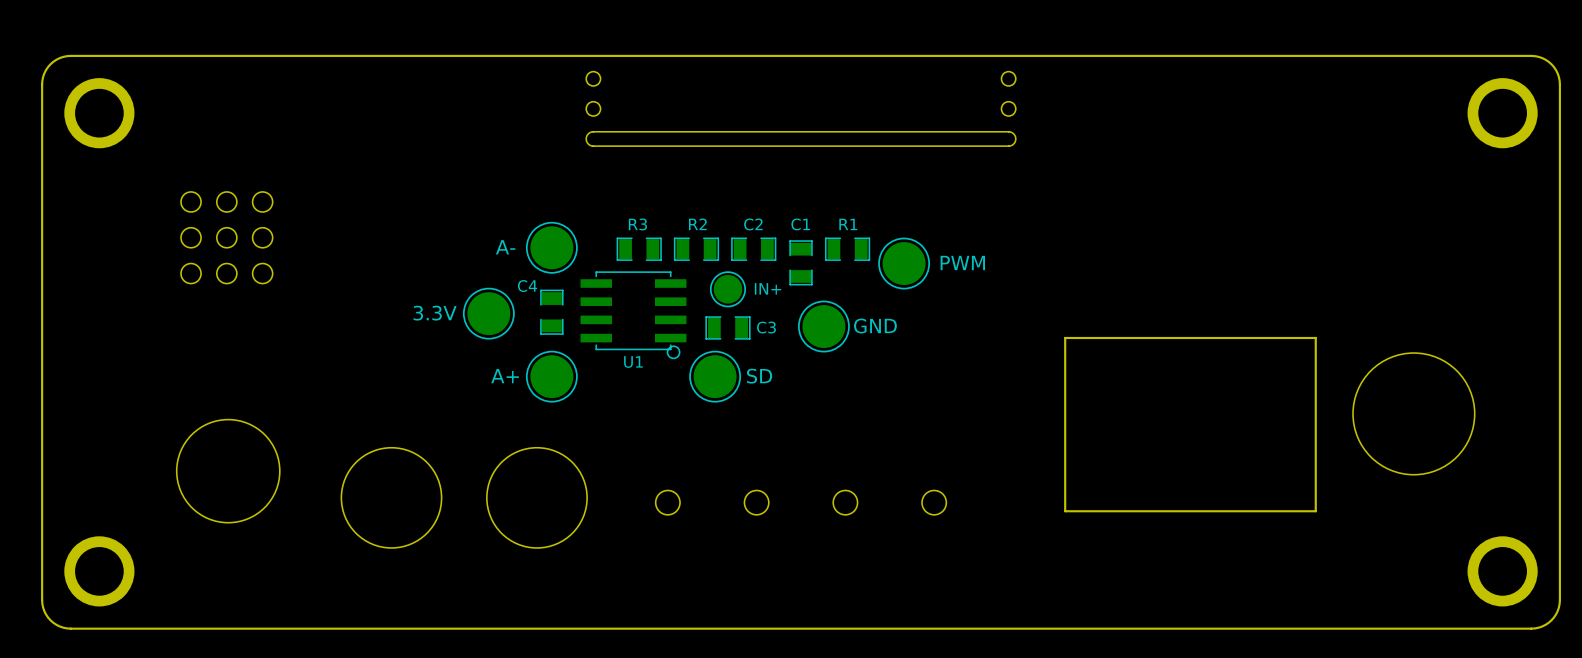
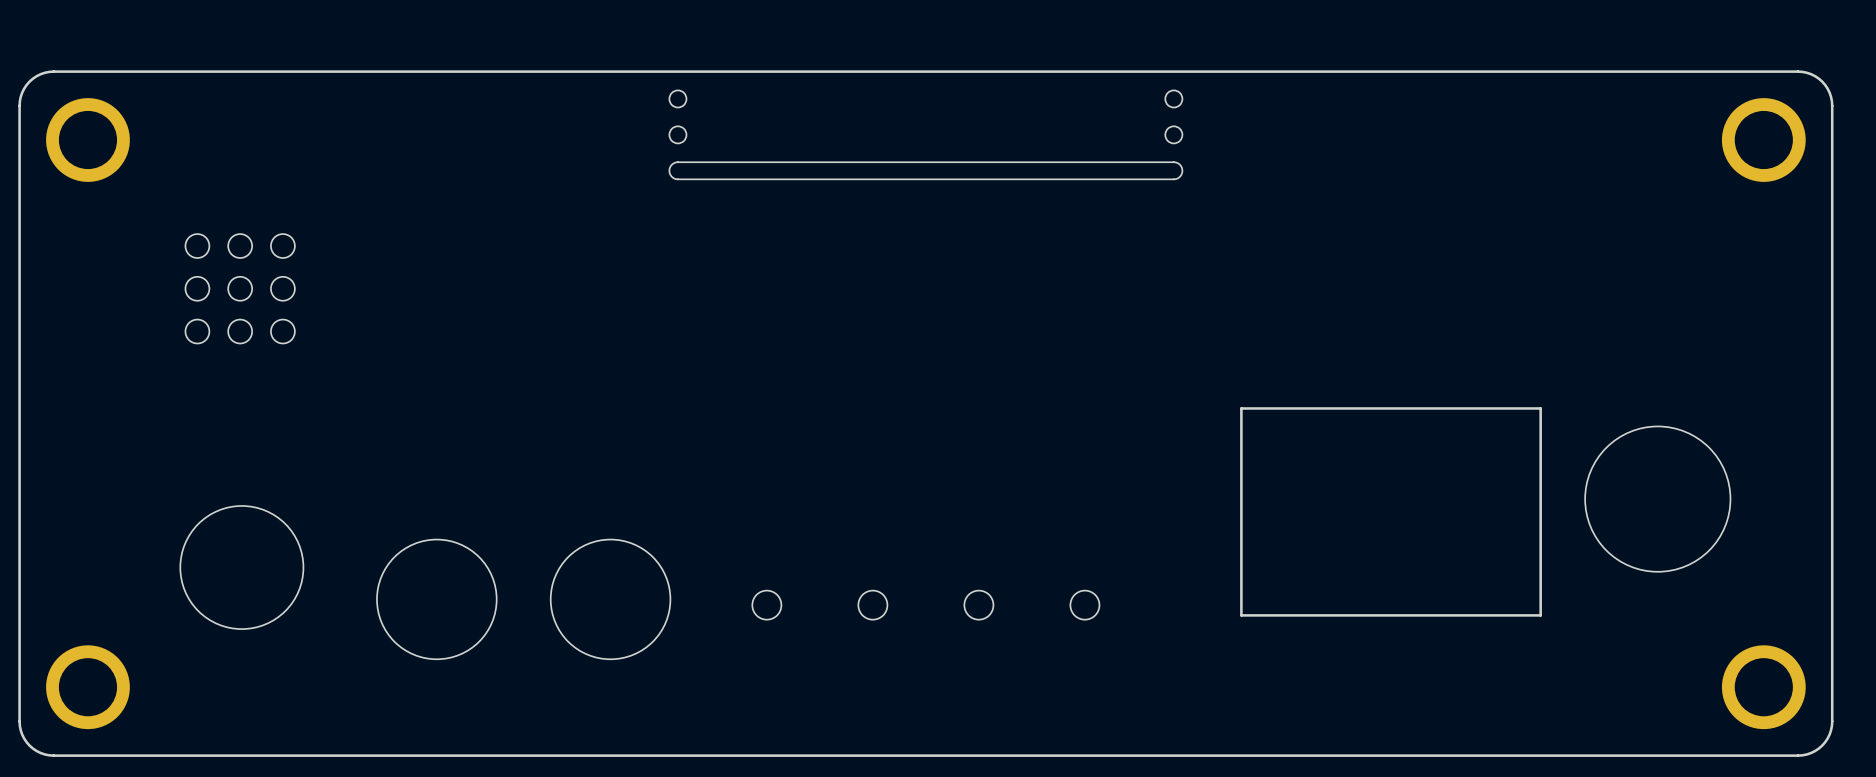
part: A- (551, 247) -> none
R3: (639, 249) -> none
R2: (696, 249) -> none
C2: (753, 249) -> none
R1: (847, 249) -> none
C1: (801, 262) -> none
part: PWM (904, 263) -> none
part: IN+ (727, 289) -> none
C4: (551, 312) -> none
part: 3.3V (488, 313) -> none
U1: (633, 315) -> none
part: GND (823, 326) -> none
C3: (727, 327) -> none
part: A+ (551, 376) -> none
part: SD (715, 376) -> none

